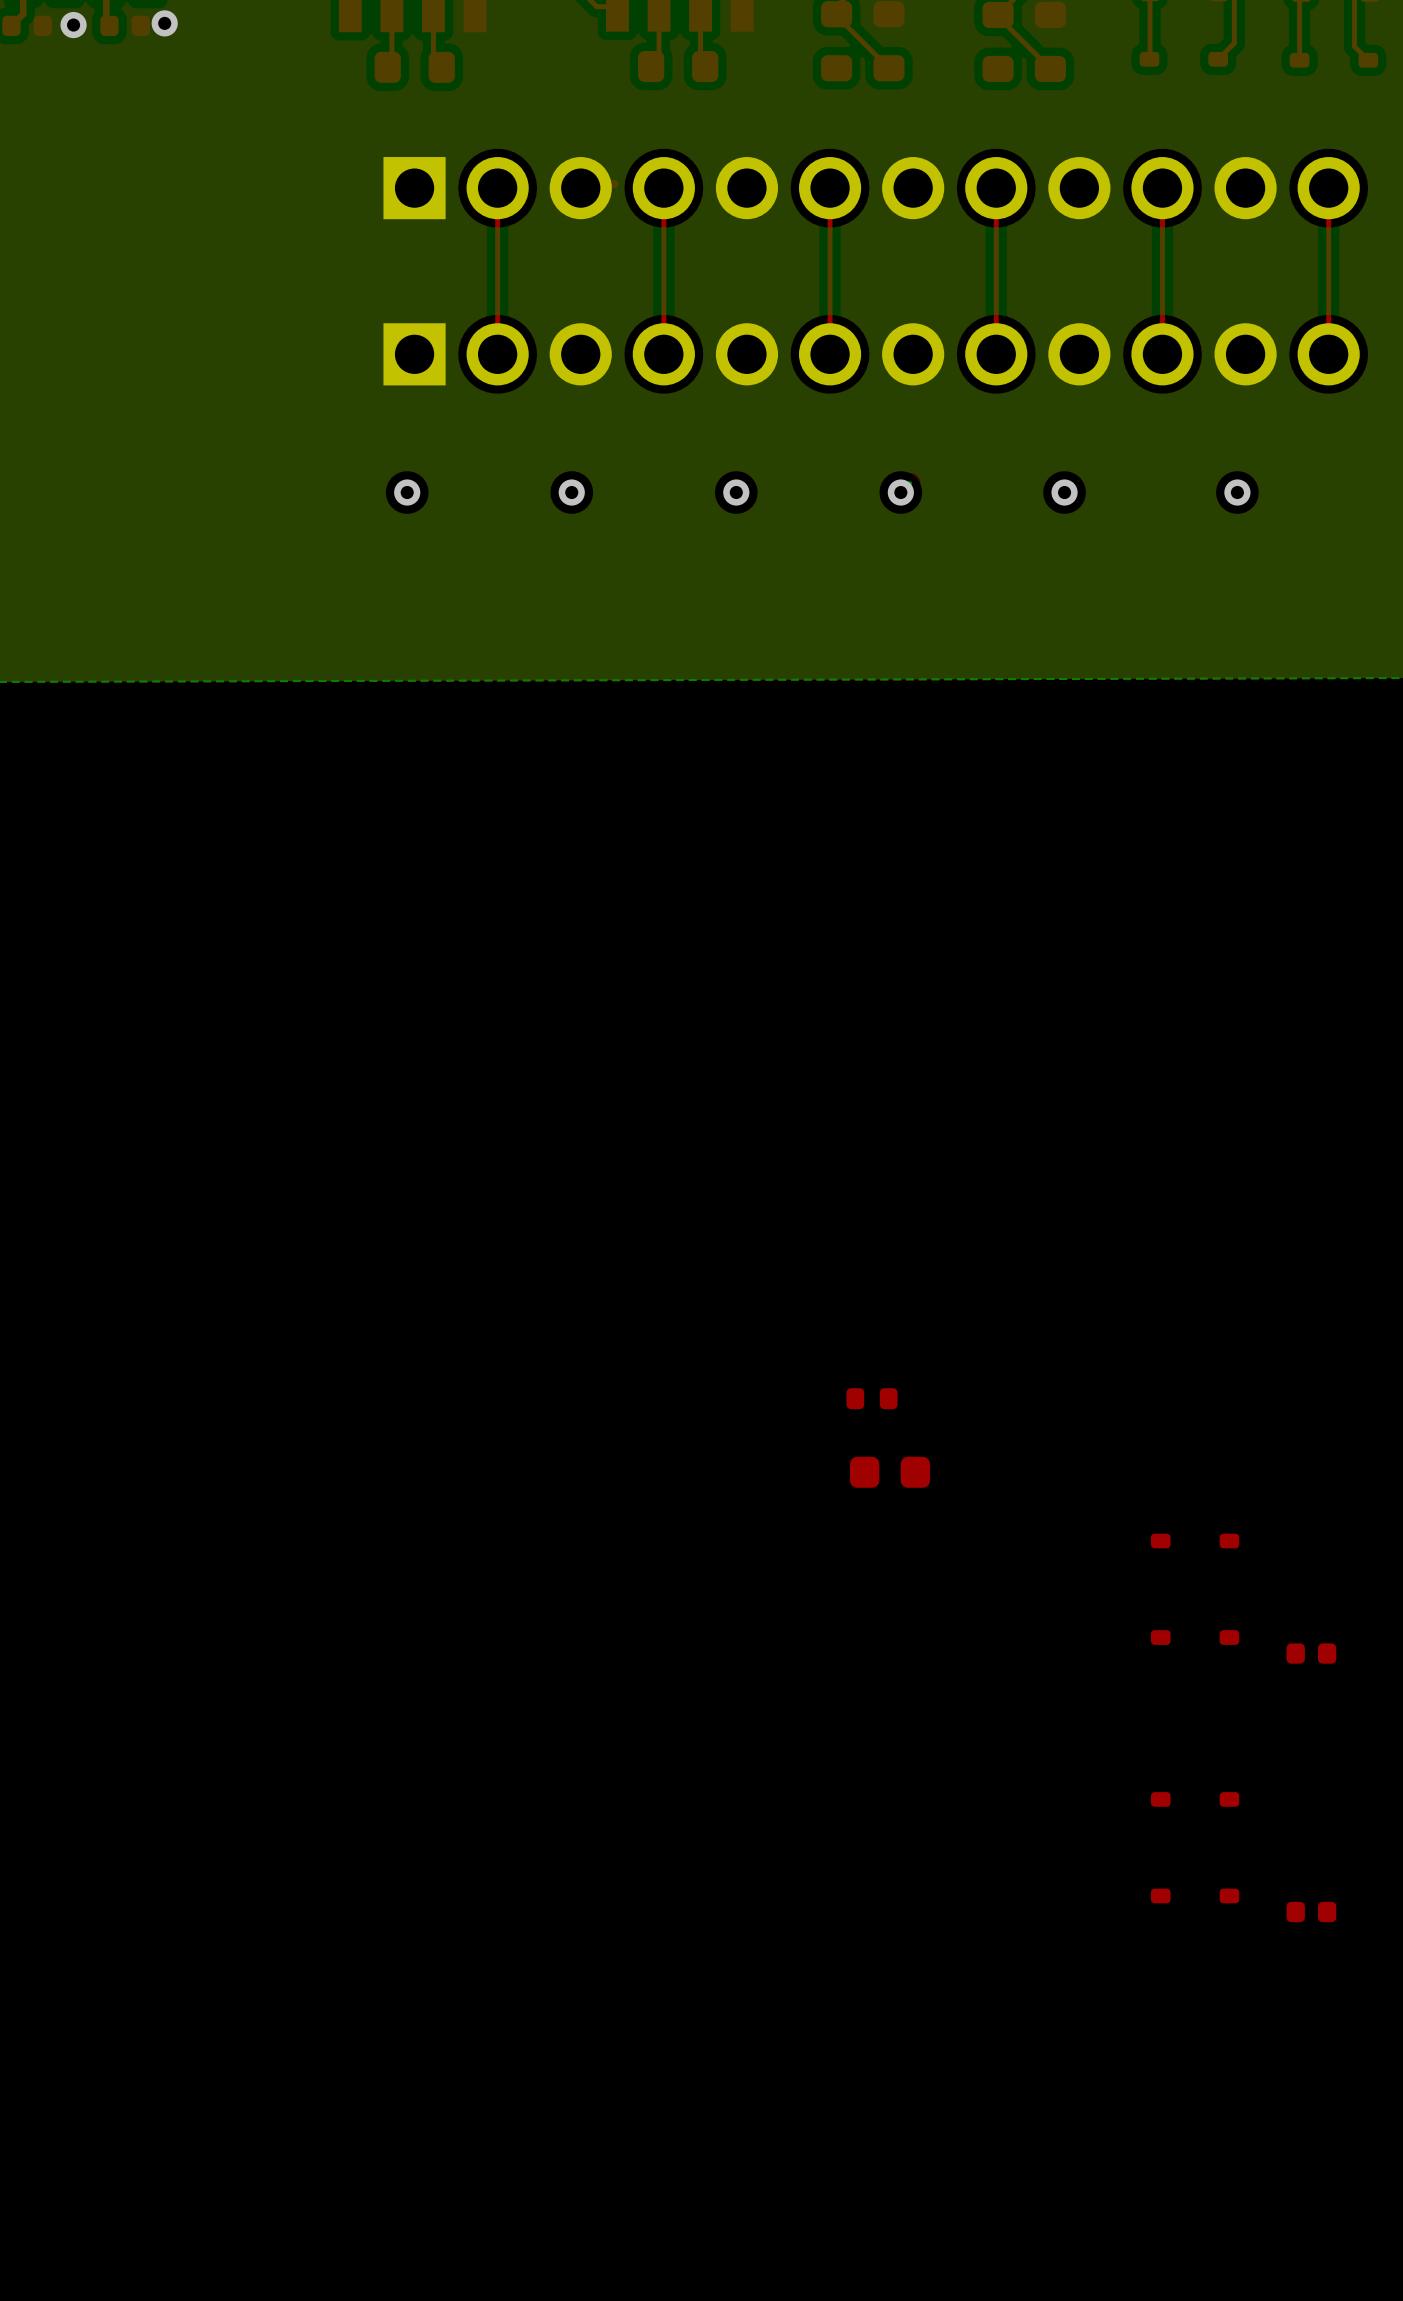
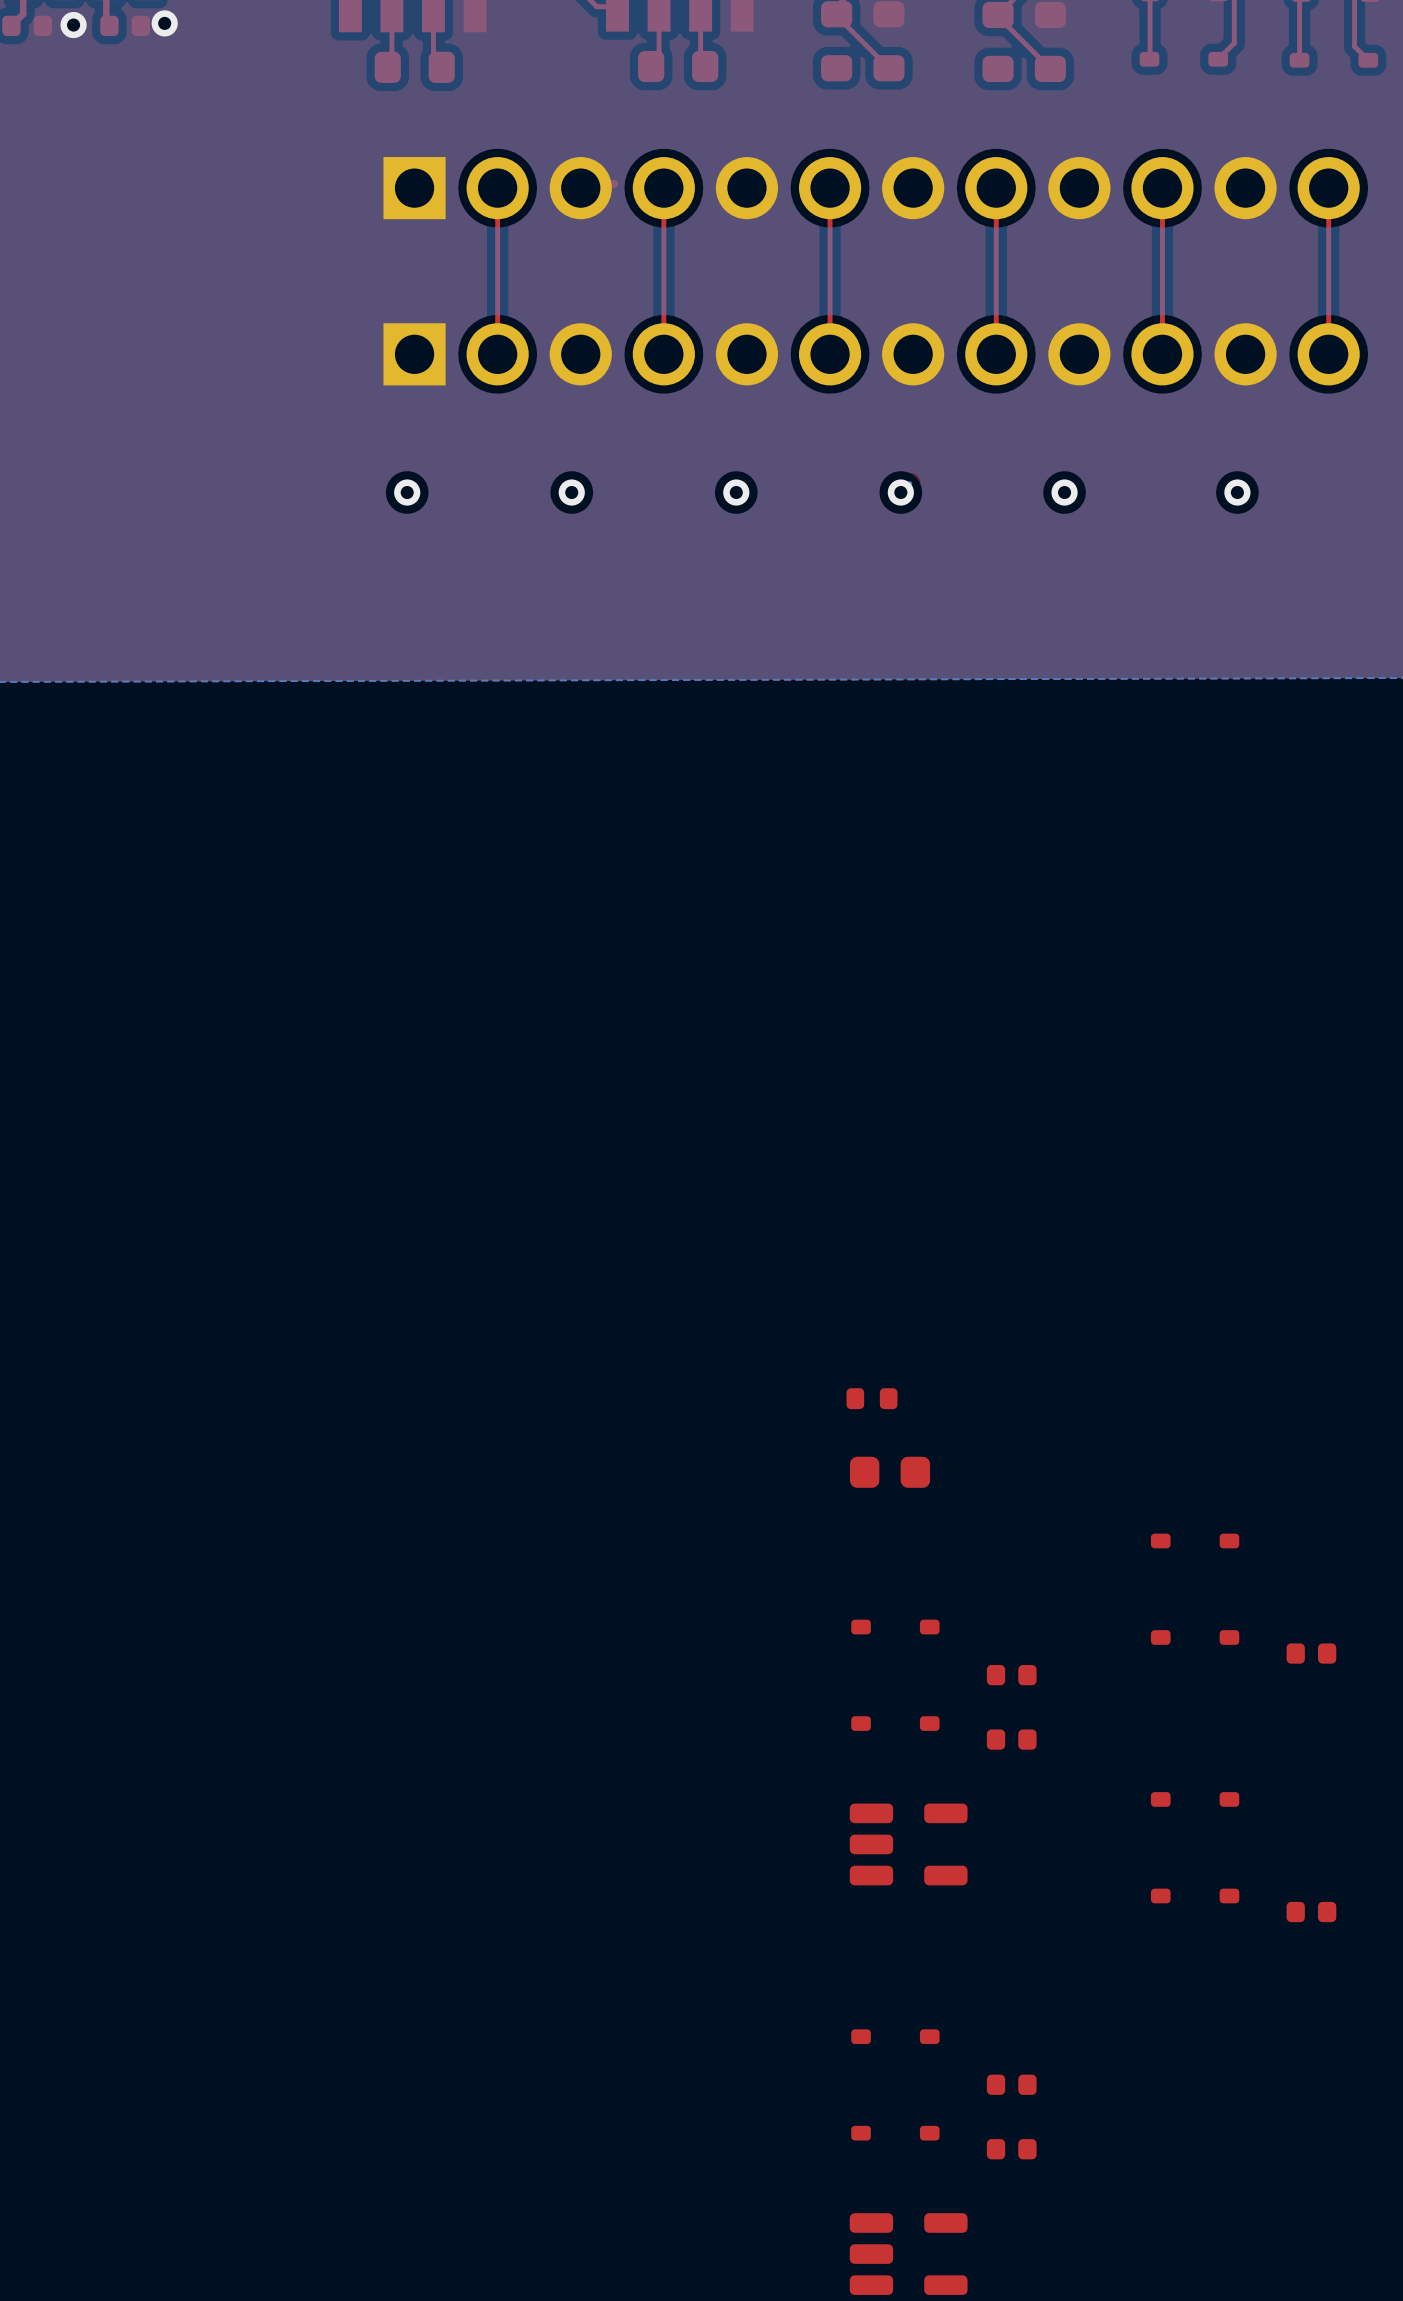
part: none -> (895, 1627)
part: none -> (1011, 1675)
part: none -> (895, 1723)
part: none -> (1011, 1739)
part: none -> (908, 1844)
part: none -> (895, 2036)
part: none -> (1011, 2084)
part: none -> (895, 2133)
part: none -> (1011, 2149)
part: none -> (908, 2254)

